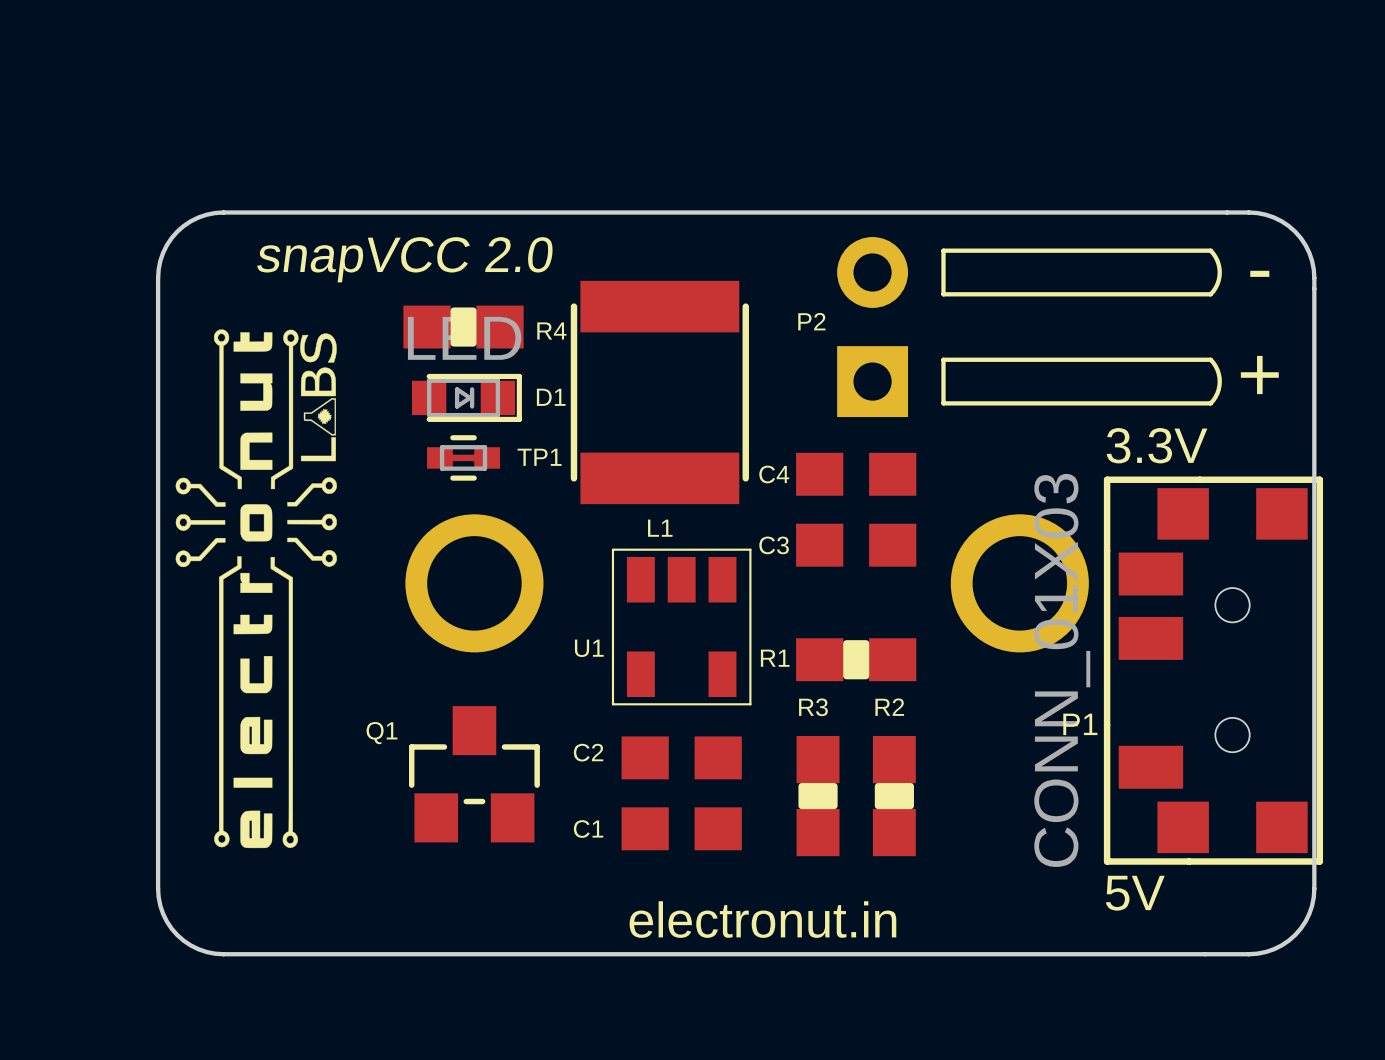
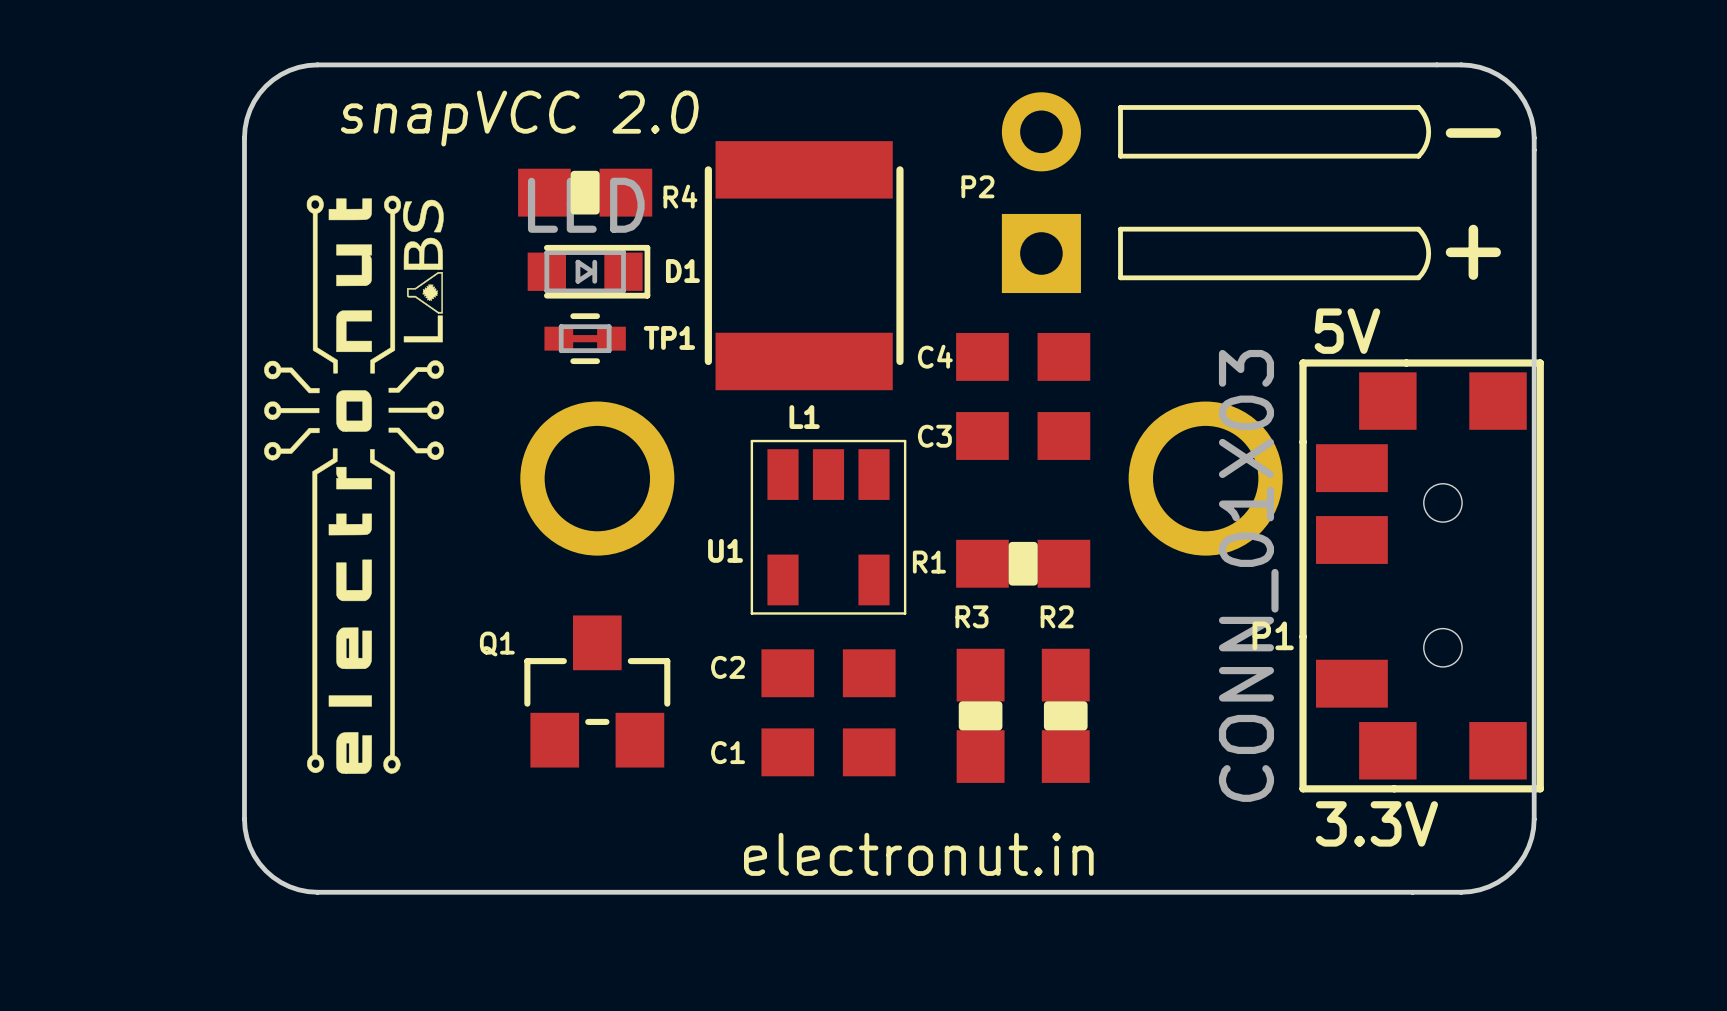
text: 3.3V (1157, 445) -> 5V (1347, 331)
text: 5V (1135, 893) -> 3.3V (1376, 823)

